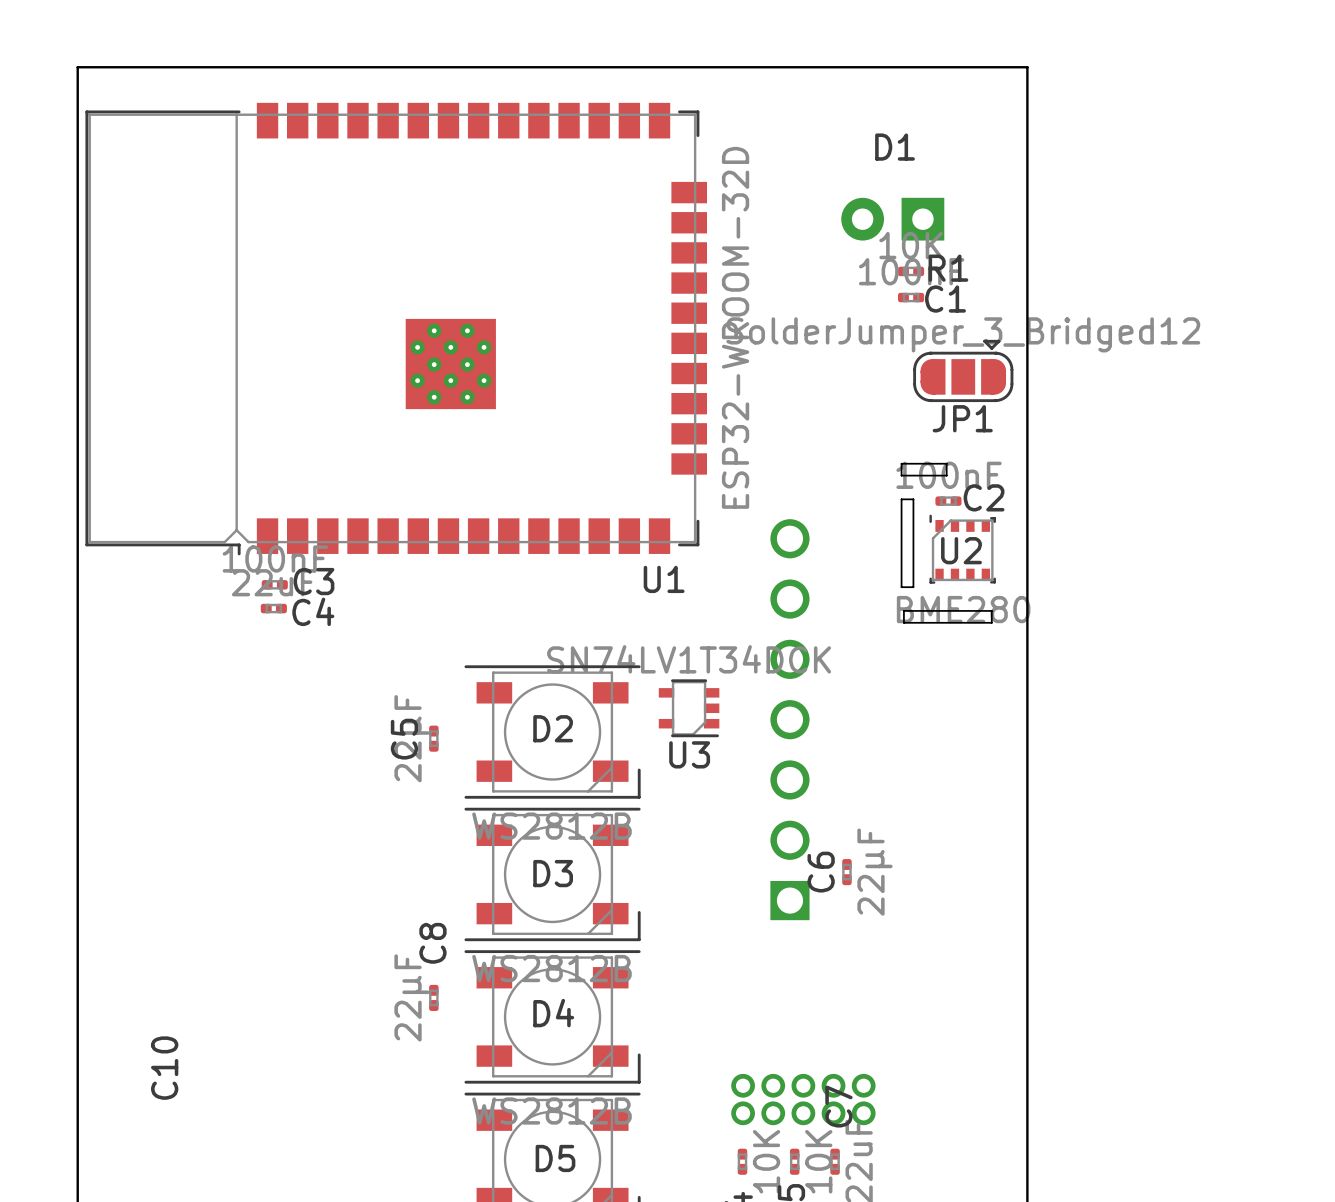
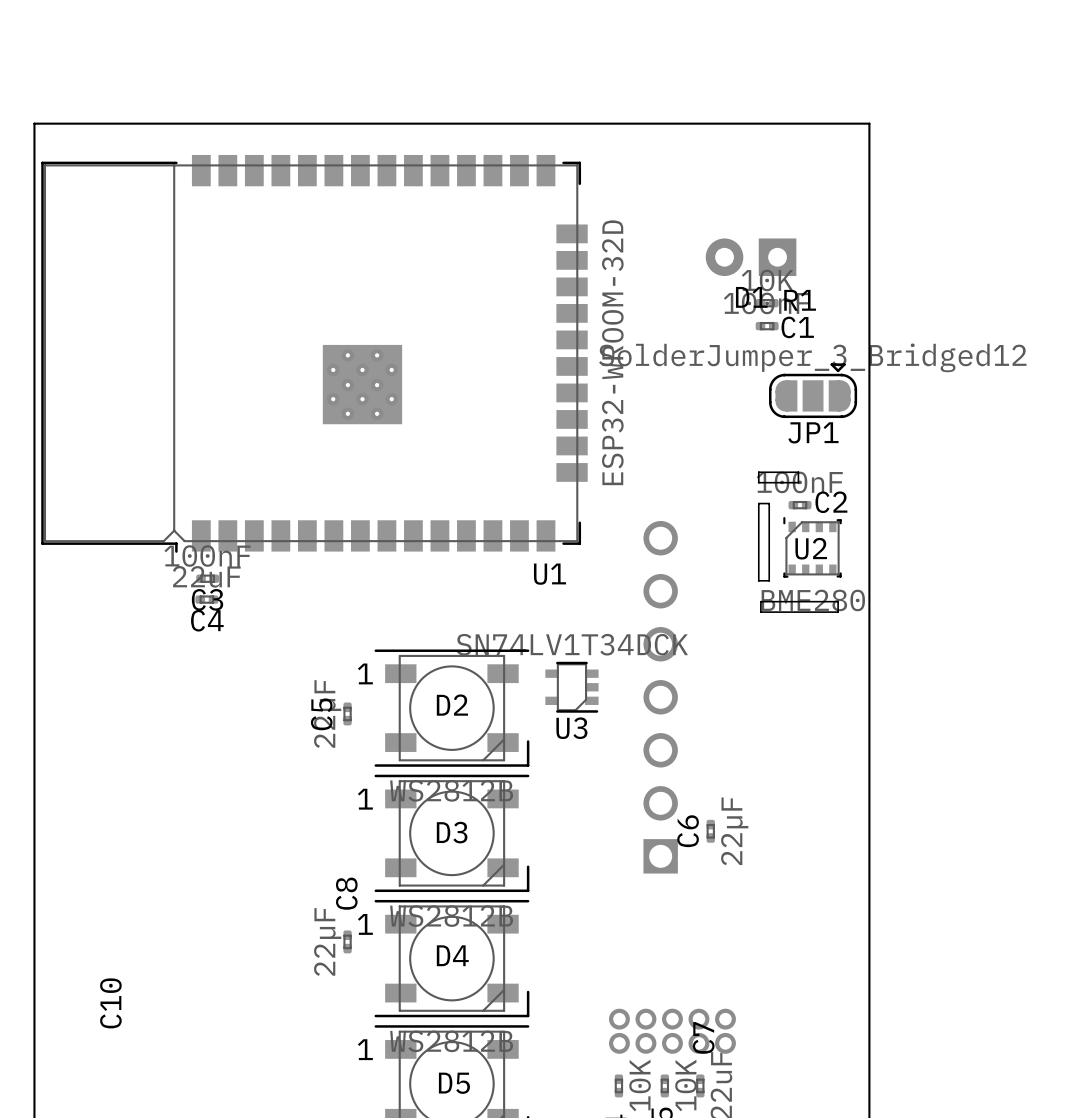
D1 name position: D1 (895, 147) -> D1 (751, 297)
C3 name position: C3 (313, 581) -> C3 (207, 599)
C4 name position: C4 (313, 611) -> C4 (207, 620)
D2 text: none -> 1 (365, 673)
D3 text: none -> 1 (365, 799)
D4 text: none -> 1 (365, 924)
D5 text: none -> 1 (365, 1049)

